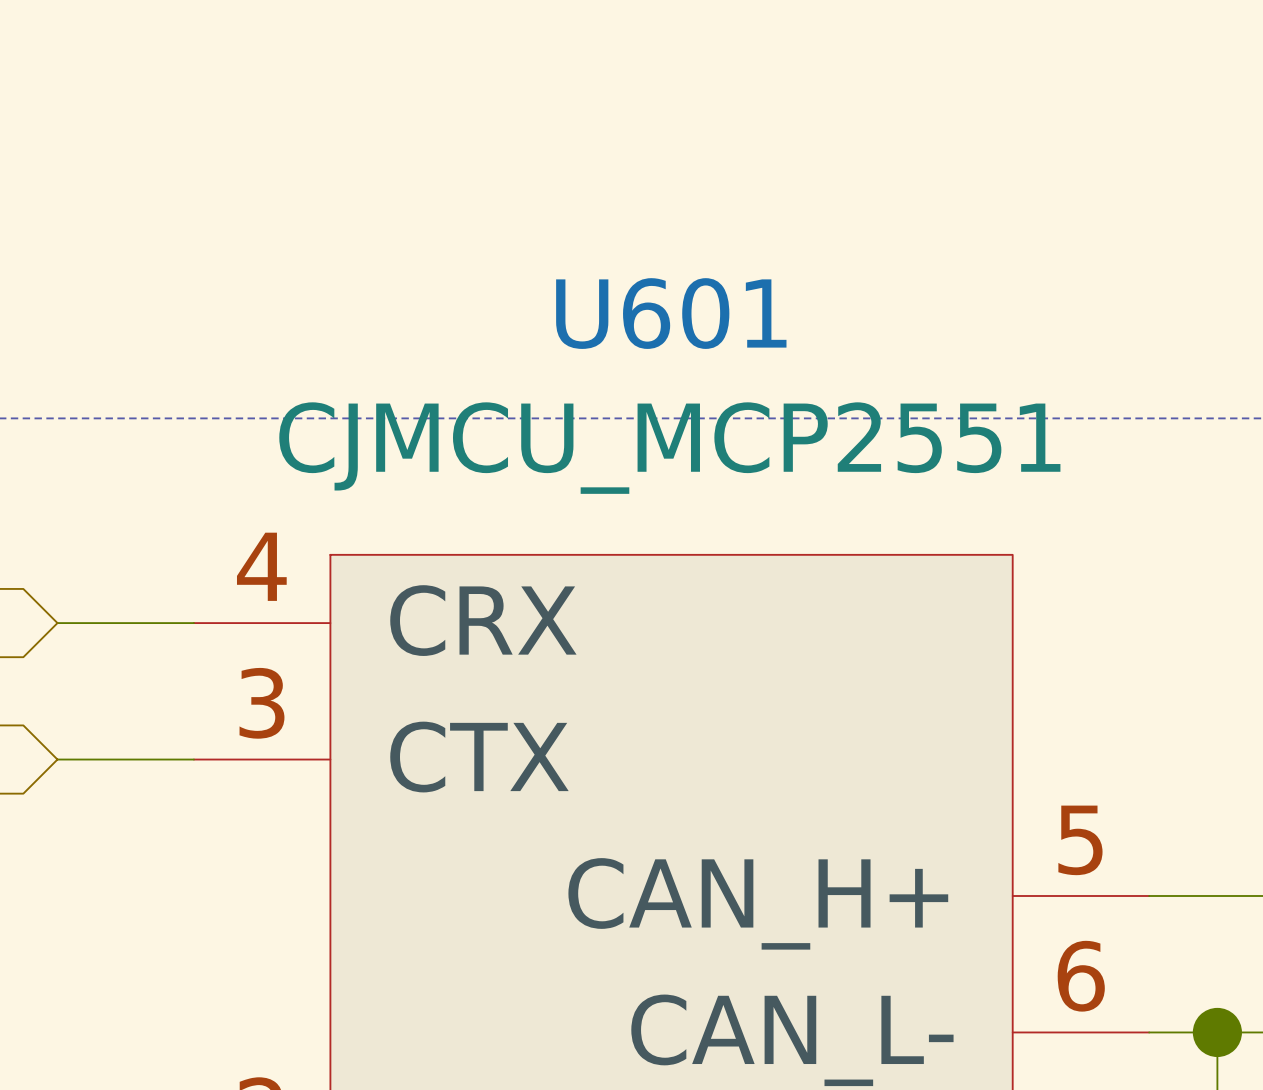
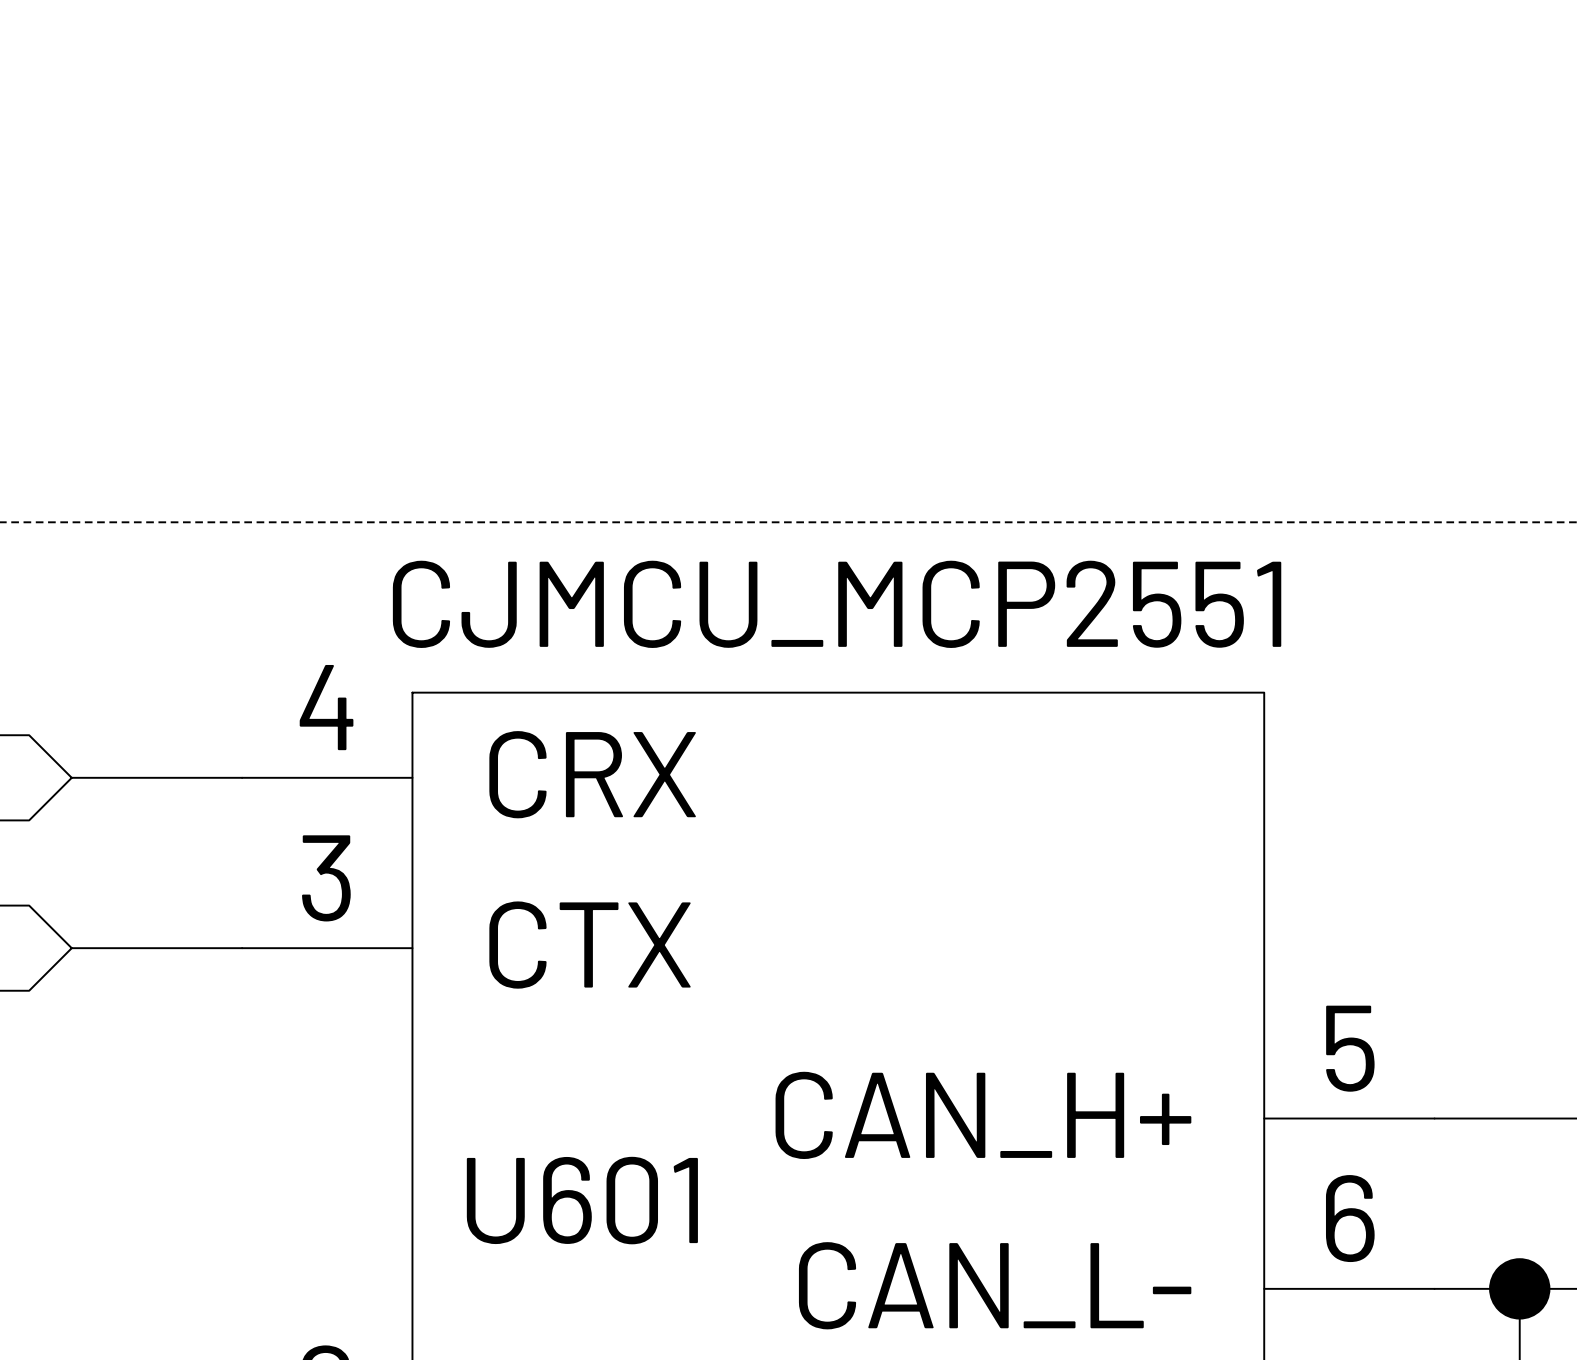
U601 name position: U601 (671, 313) -> U601 (582, 1200)
U601 value position: CJMCU_MCP2551 (669, 448) -> CJMCU_MCP2551 (837, 604)

